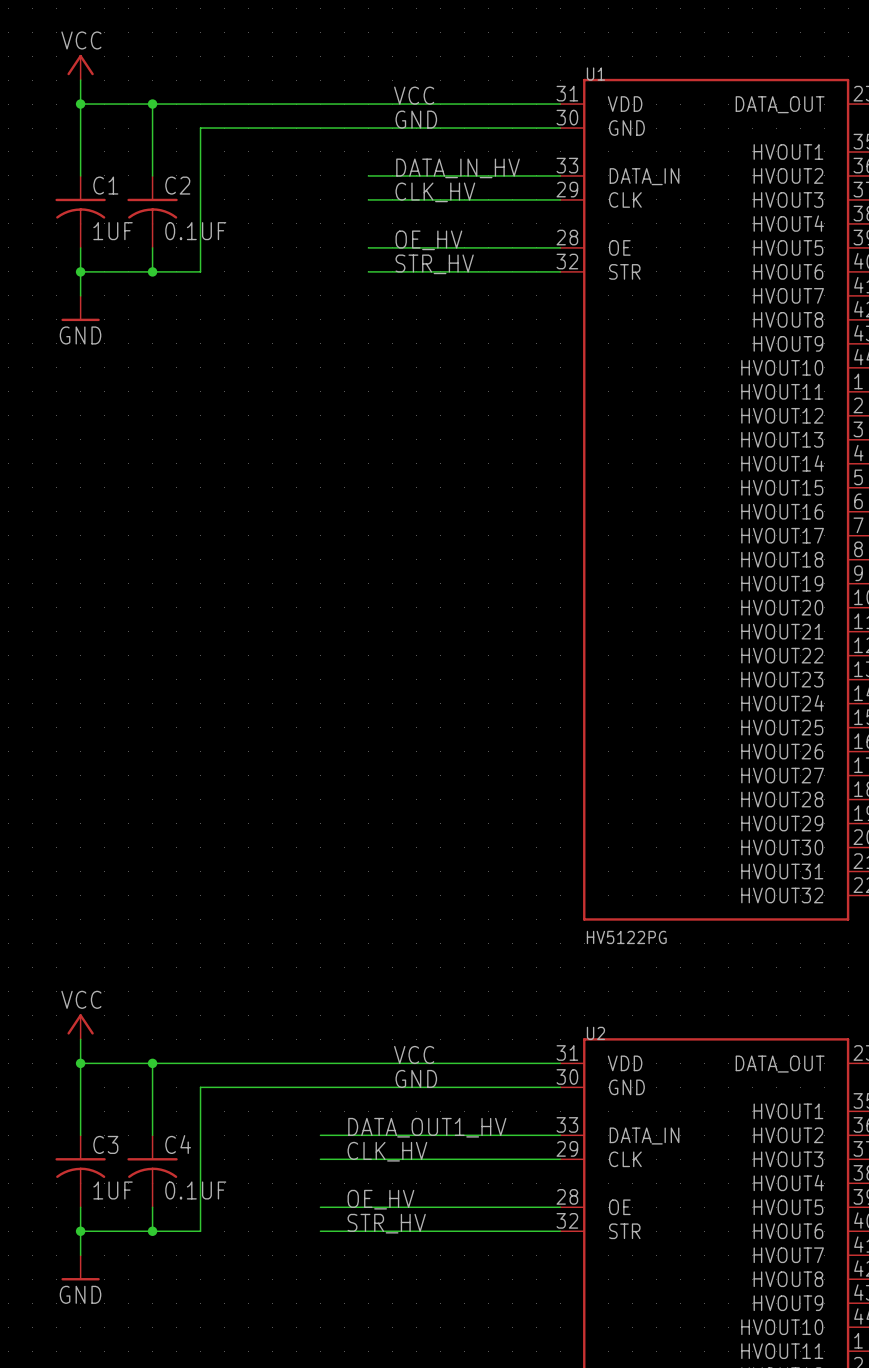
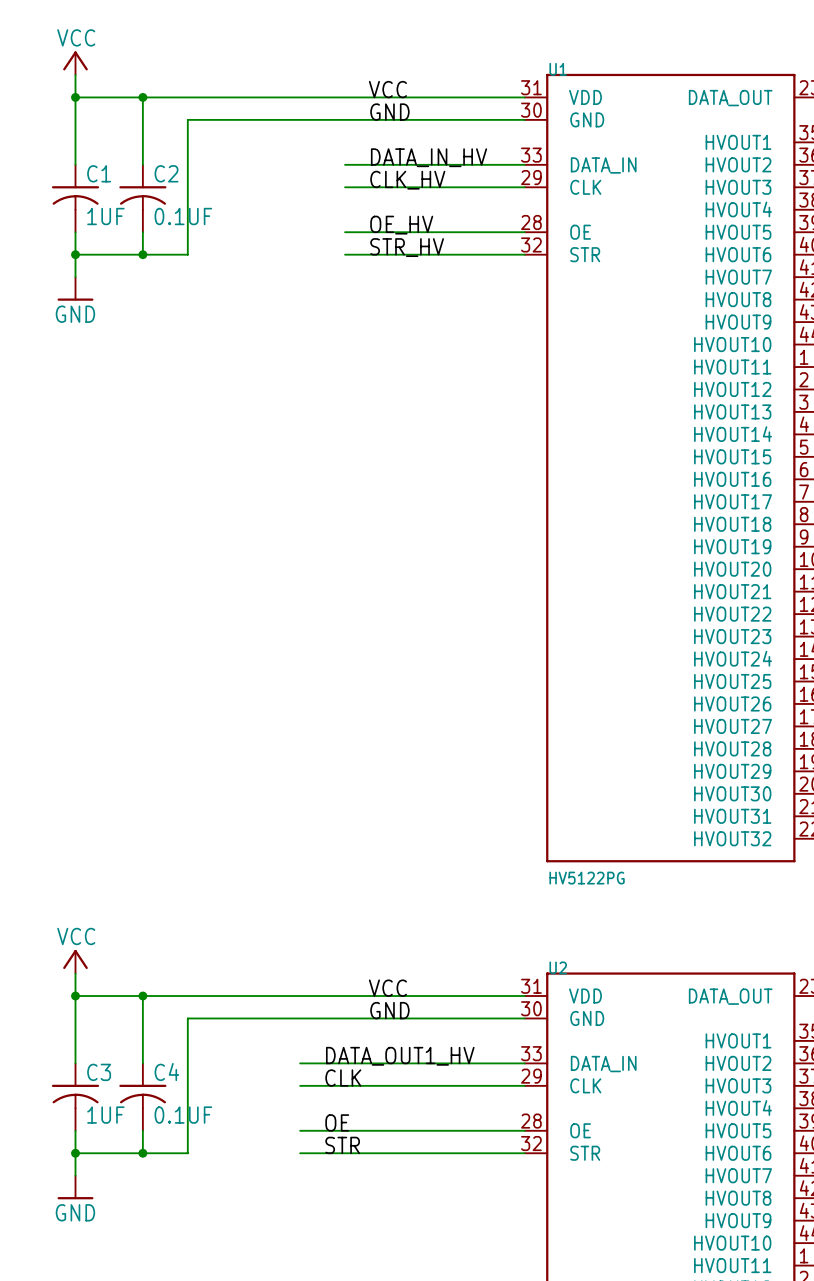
label: CLK_HV (387, 1151) -> CLK (343, 1078)
label: OE_HV (380, 1199) -> OE (337, 1122)
label: STR_HV (386, 1223) -> STR (342, 1145)

